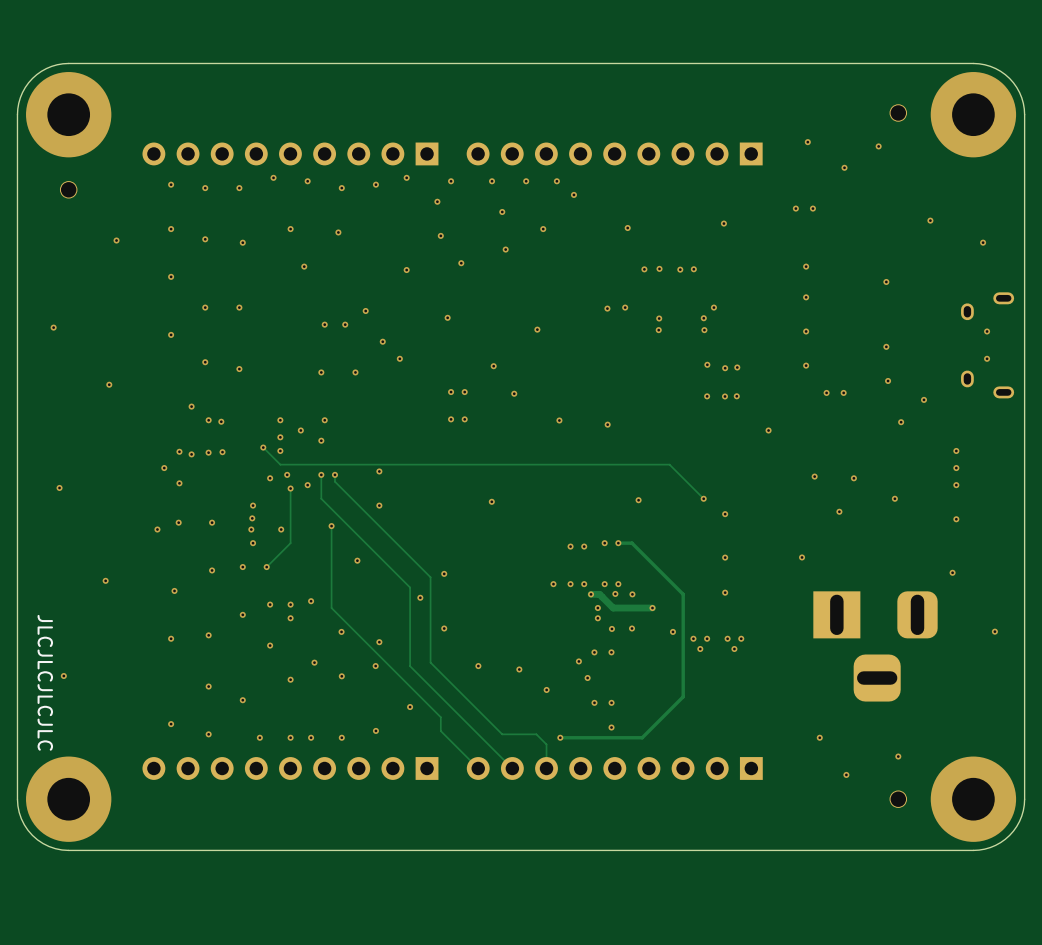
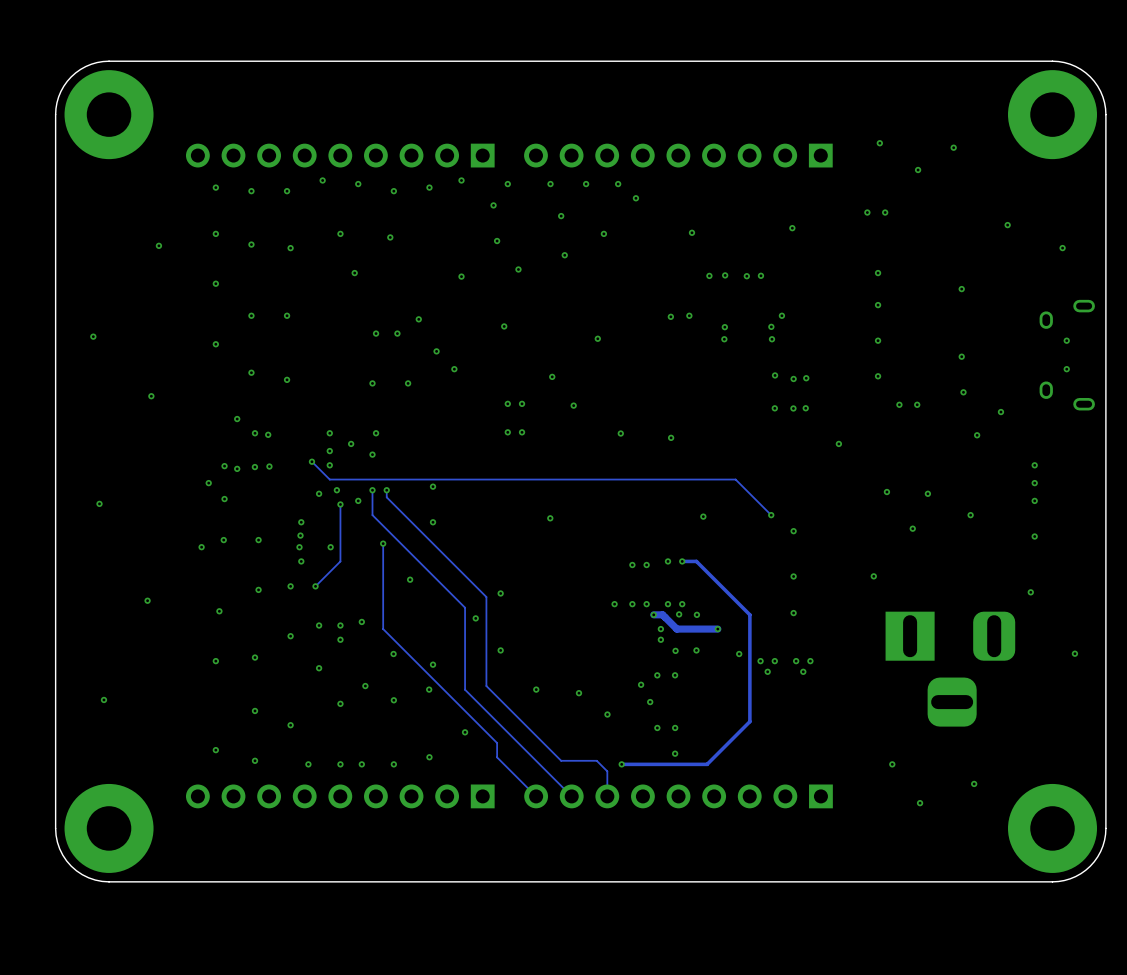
part: (898, 112) -> none
part: (68, 189) -> none
text: JLCJLCJLCJLC (45, 682) -> none
part: (898, 799) -> none

